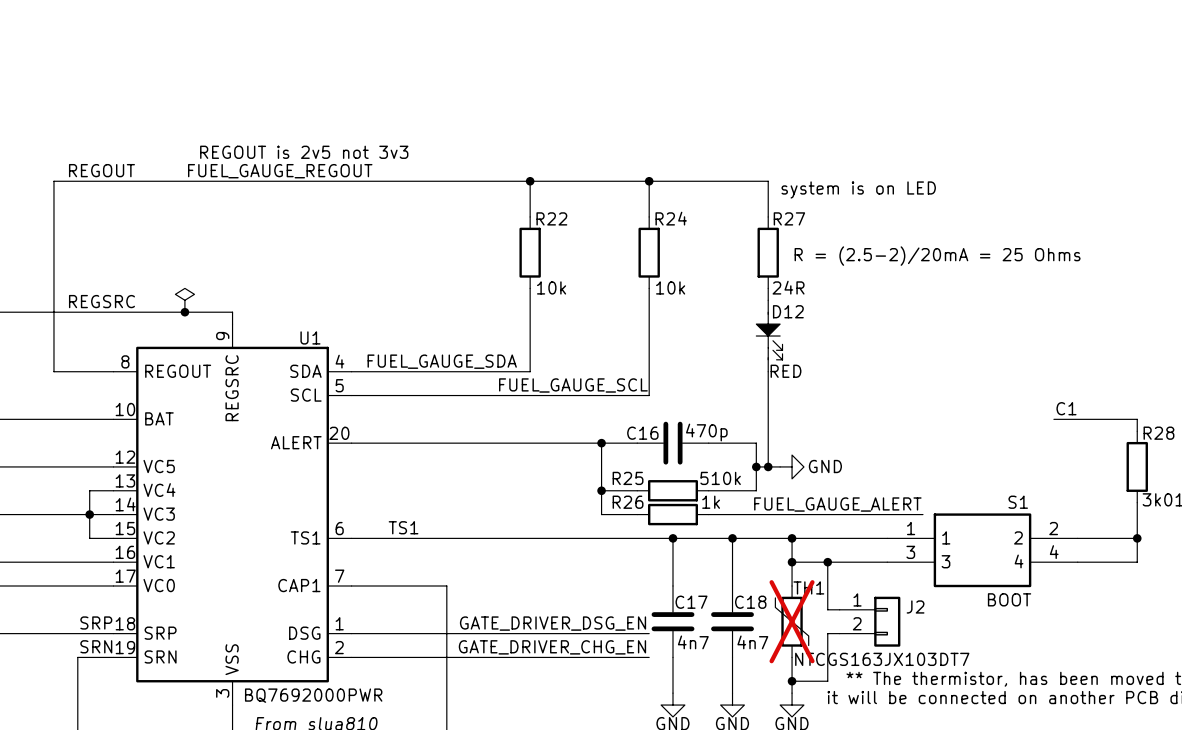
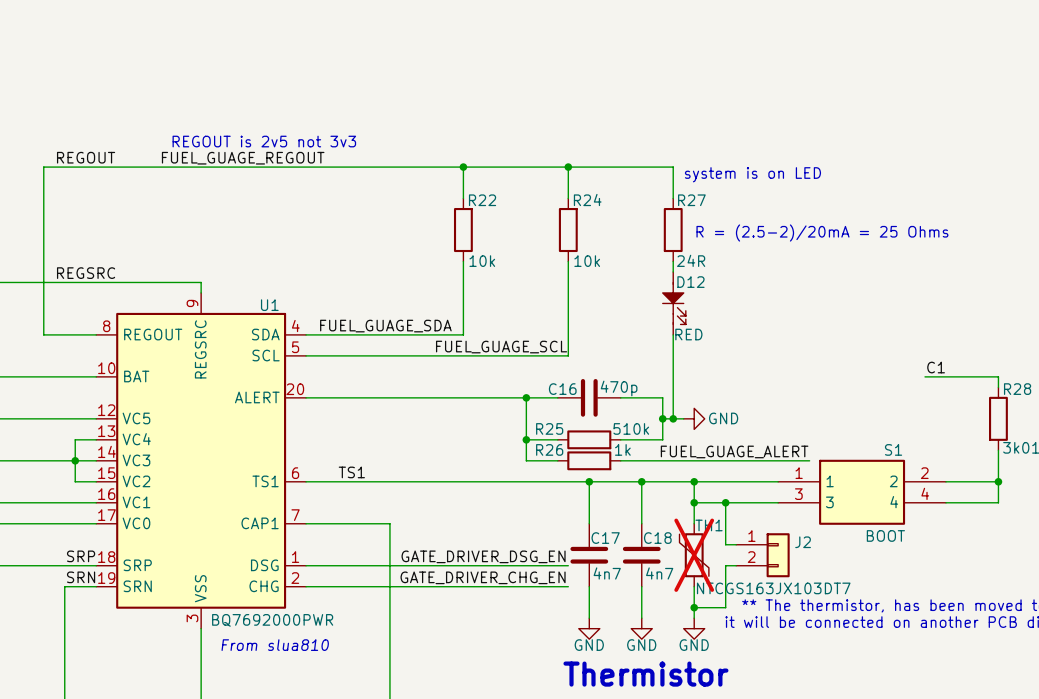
label: FUEL_GAUGE_REGOUT (280, 171) -> FUEL_GUAGE_REGOUT (243, 158)
power symbol: (184, 300) -> none
junction: (184, 312) -> none
label: FUEL_GAUGE_SDA (442, 361) -> FUEL_GUAGE_SDA (385, 326)
label: FUEL_GAUGE_SCL (573, 385) -> FUEL_GUAGE_SCL (501, 347)
label: FUEL_GAUGE_ALERT (837, 504) -> FUEL_GUAGE_ALERT (734, 451)

